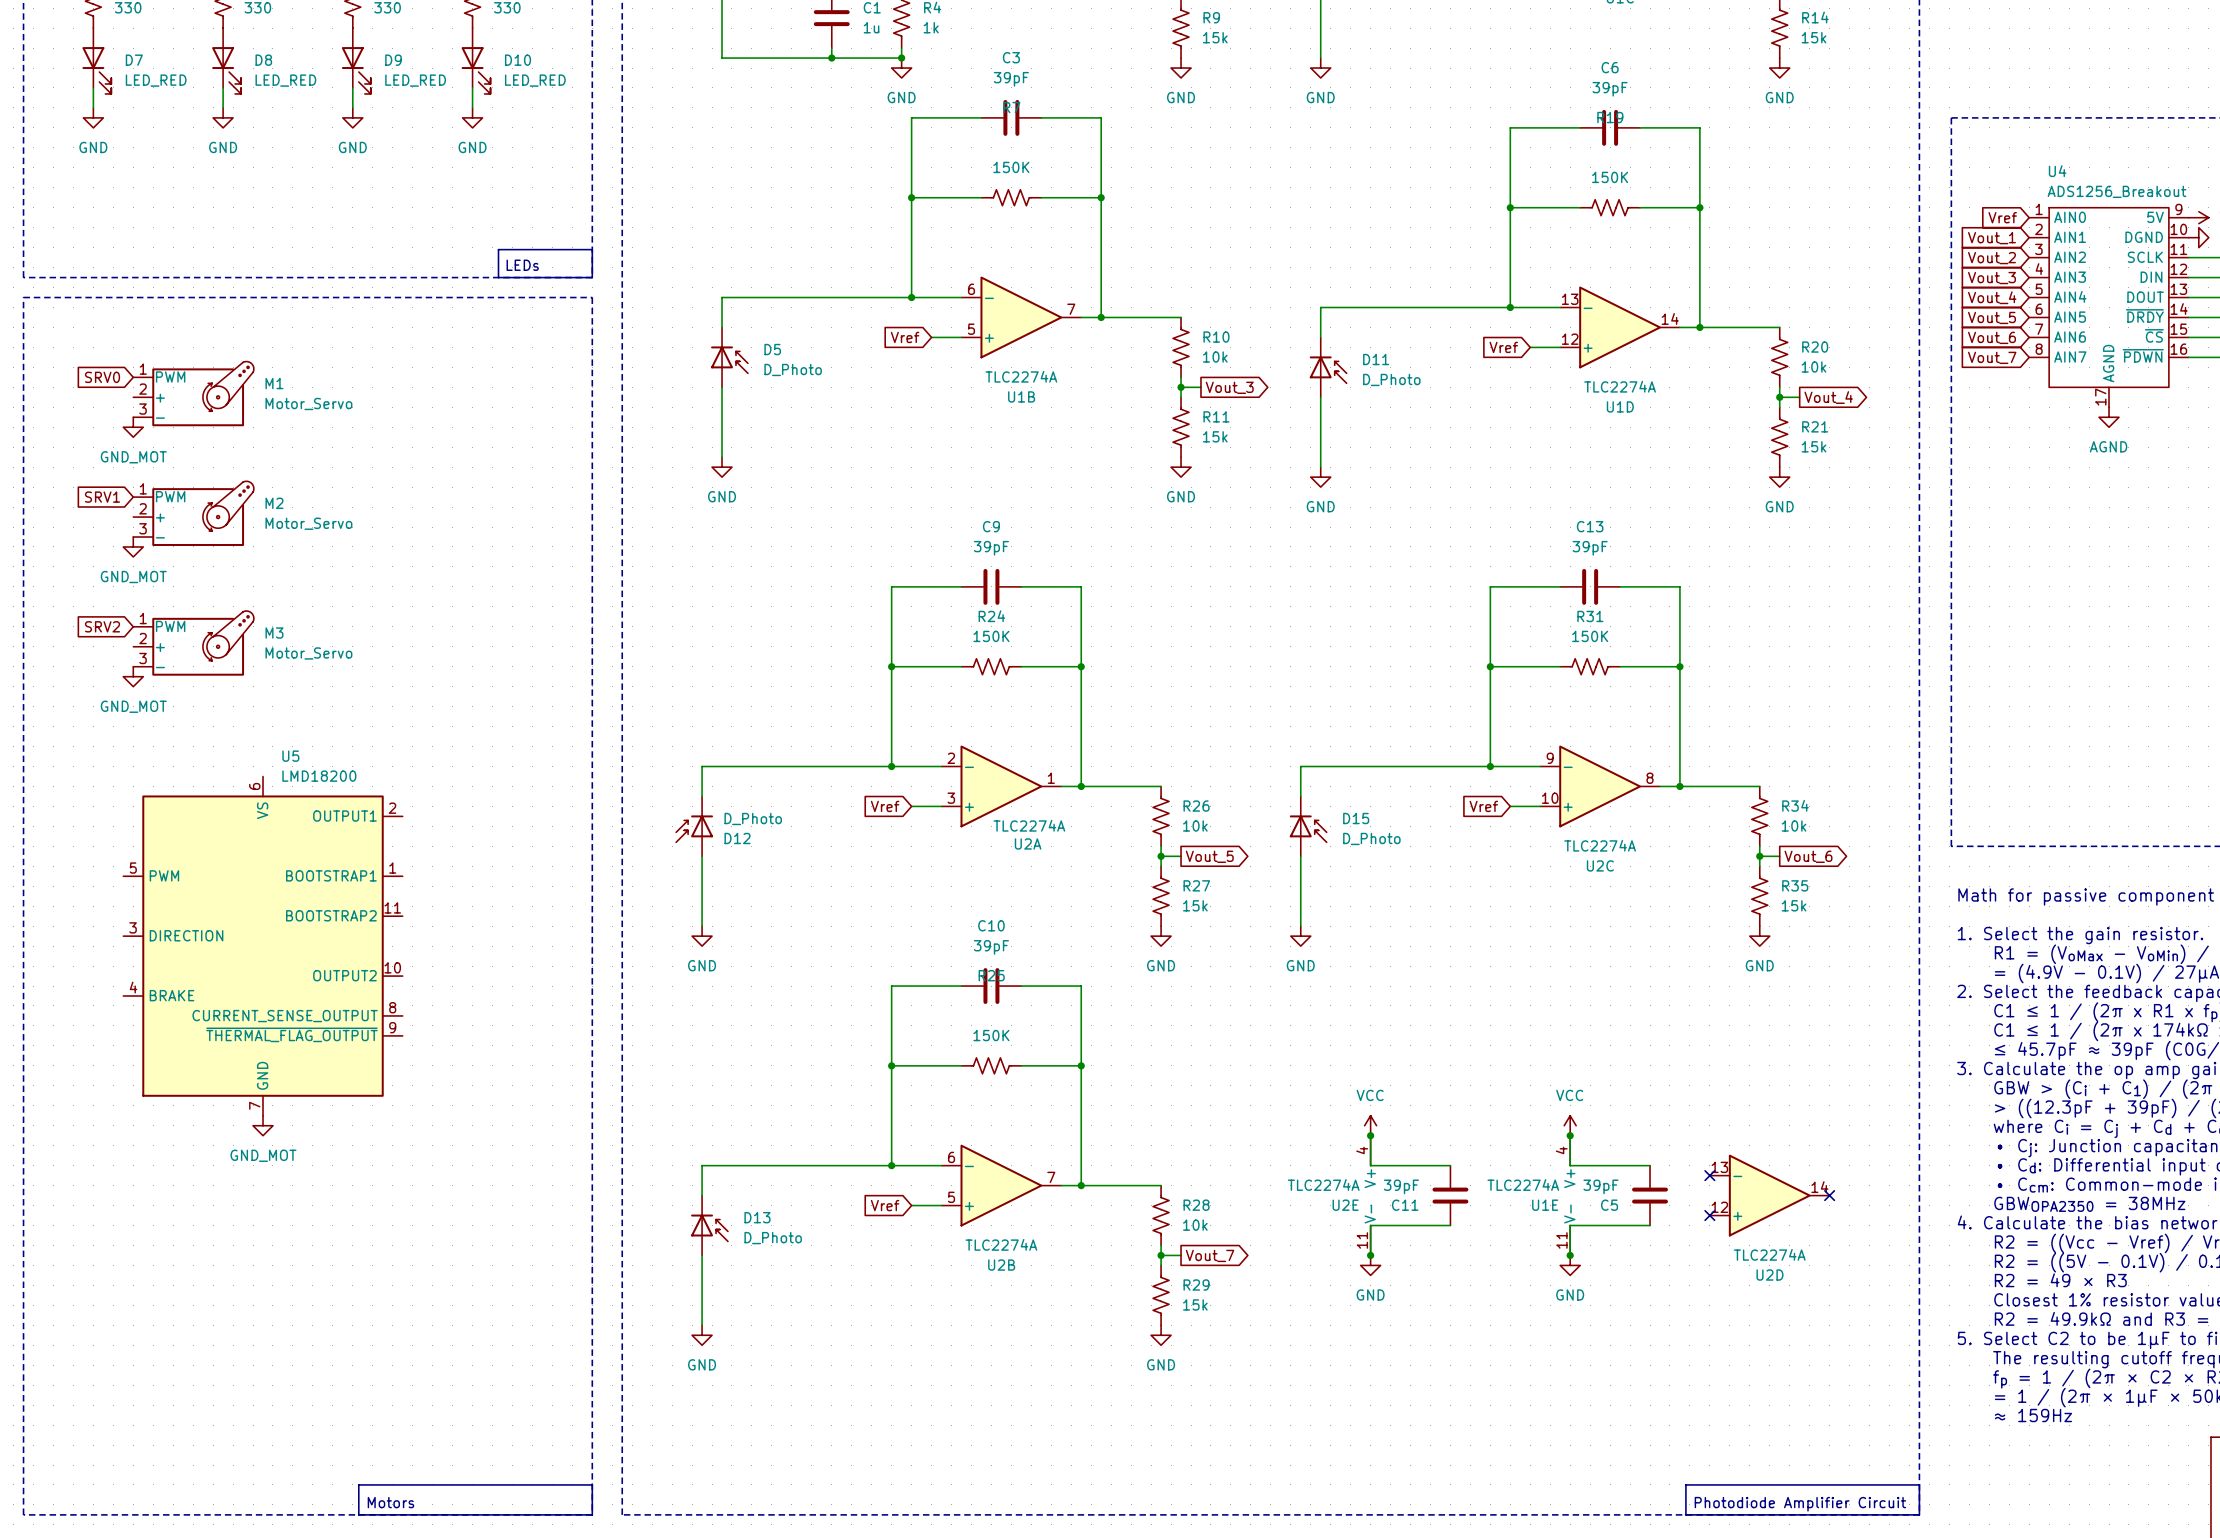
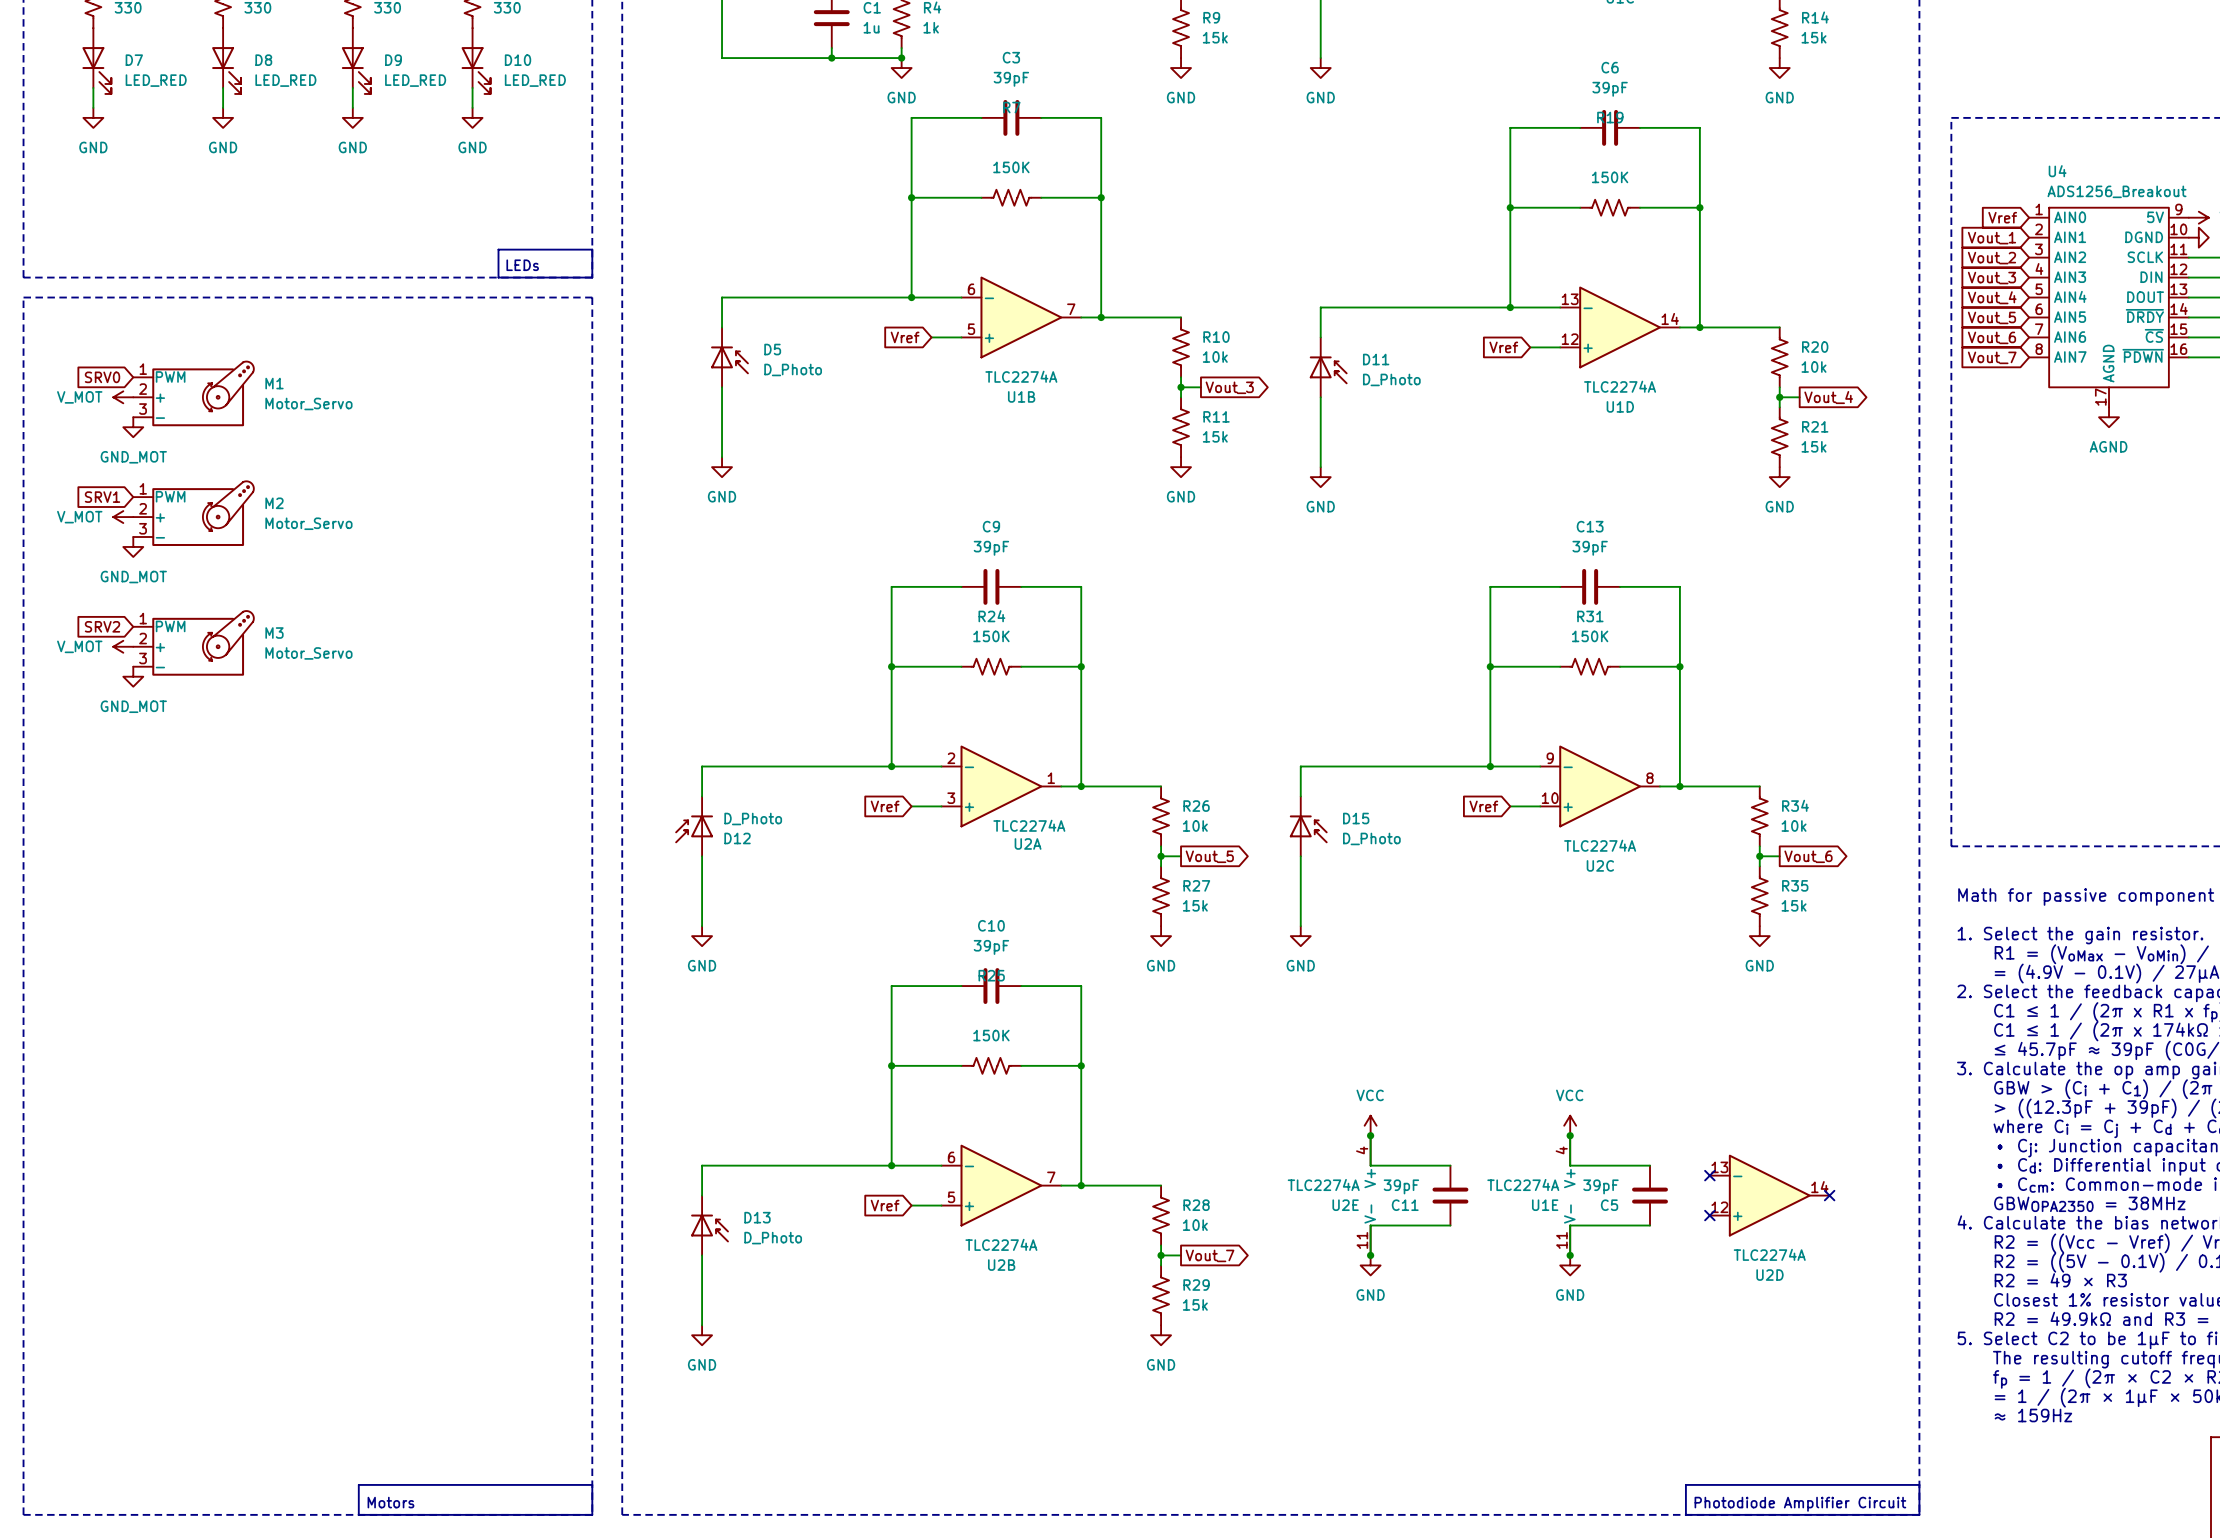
power symbol: none -> V_MOT (123, 397)
power symbol: none -> V_MOT (123, 517)
power symbol: none -> V_MOT (123, 646)
U5: LMD18200 (263, 946) -> none
power symbol: GND_MOT (263, 1125) -> none

